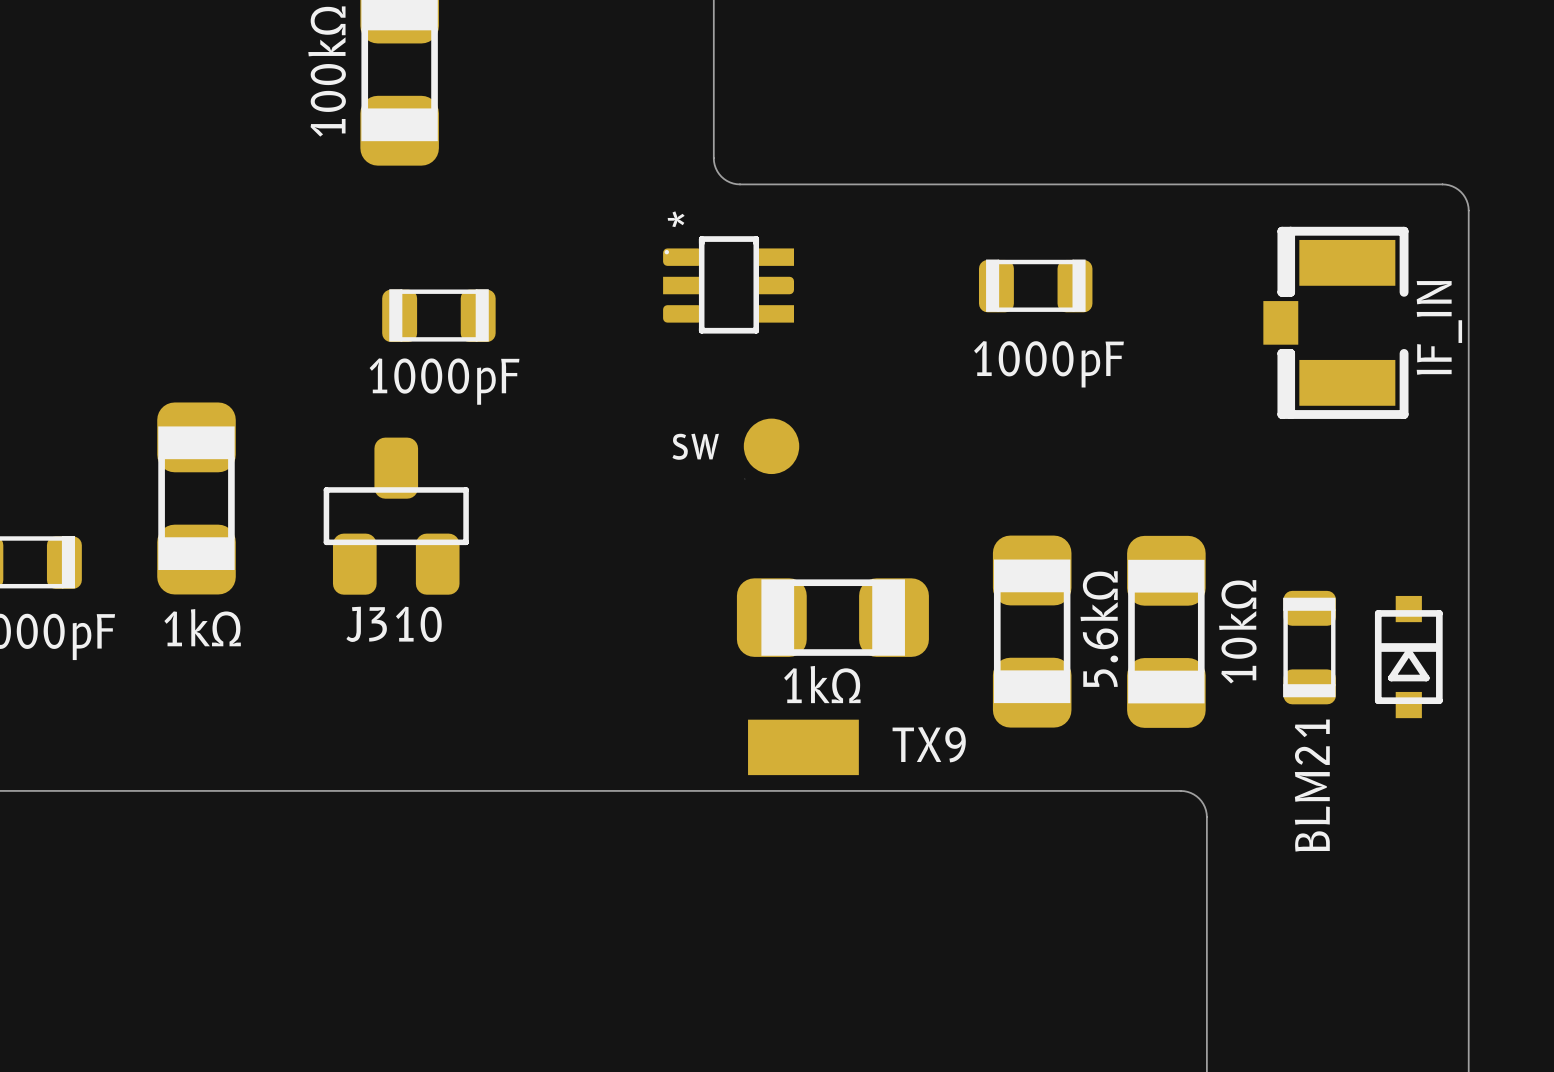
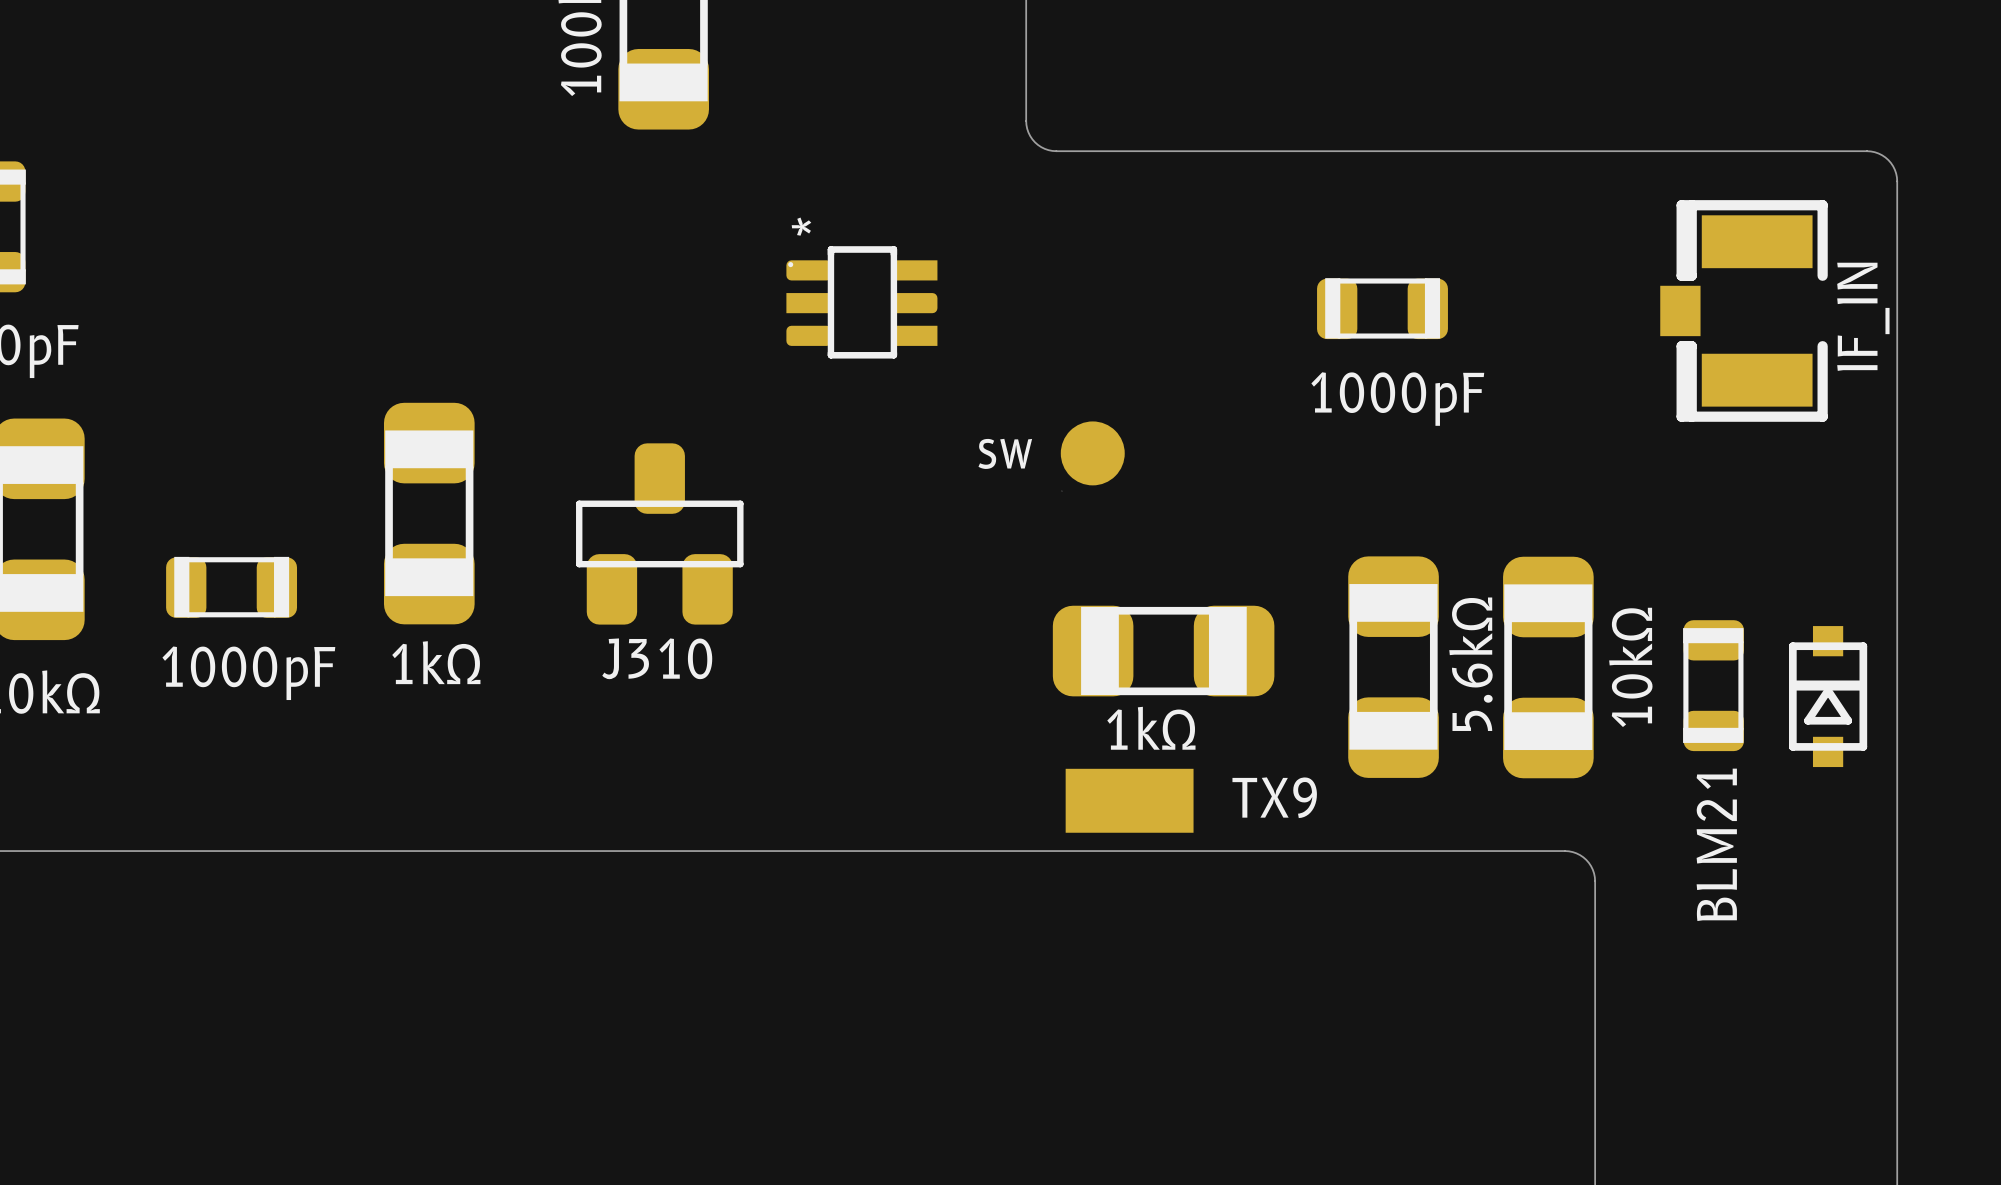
part position: (728, 284) -> (861, 302)
part position: (1035, 285) -> (1382, 308)
part: 1000pF (438, 315) -> none

